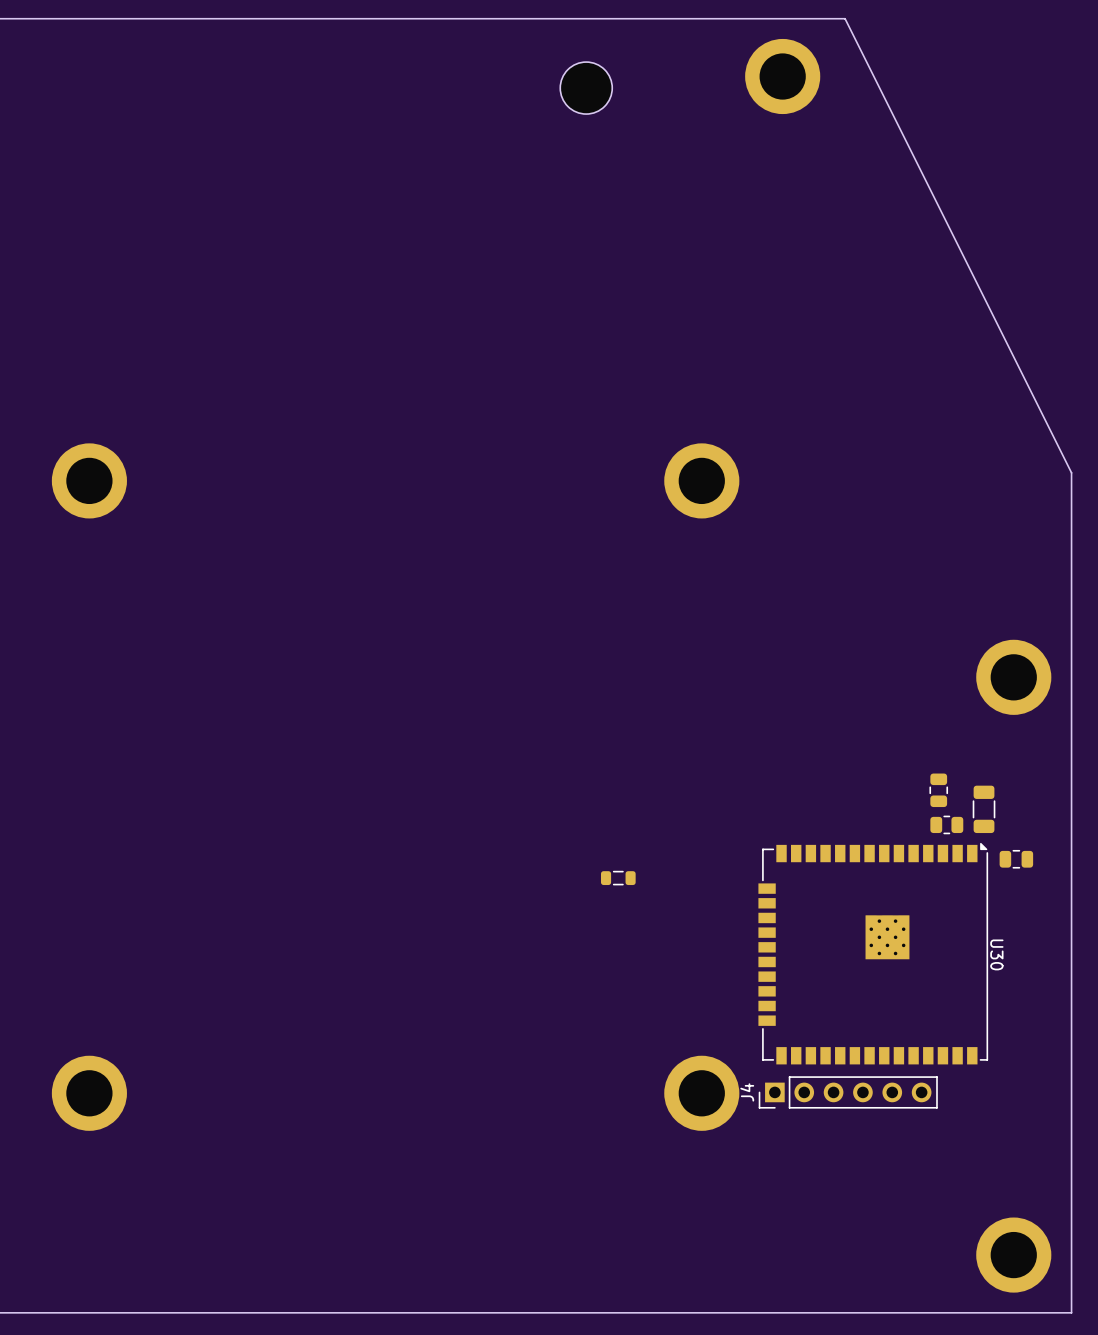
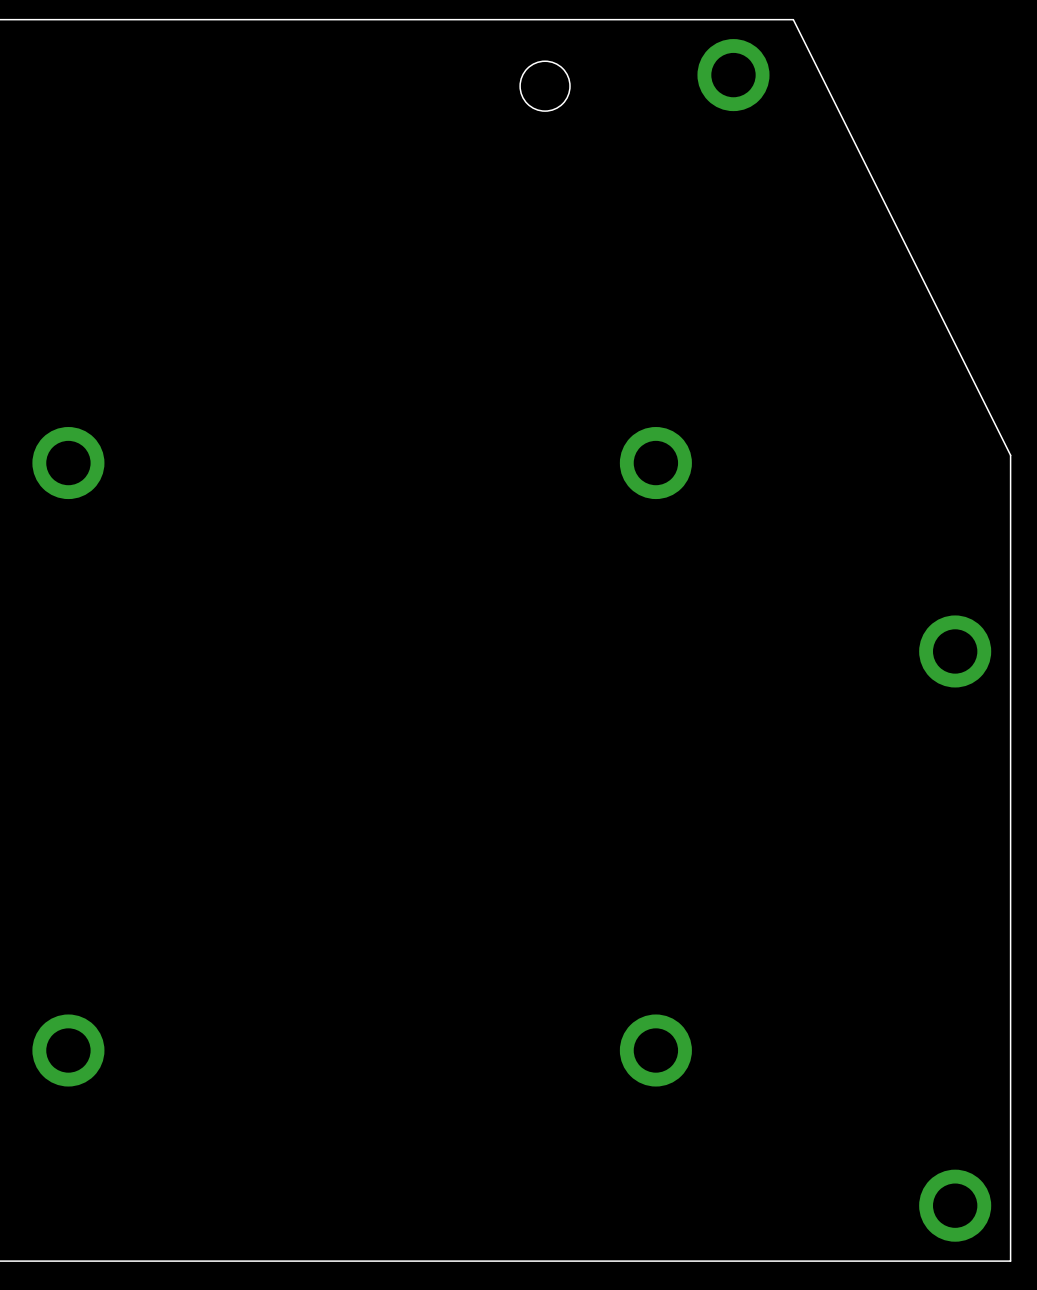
part: (938, 790) -> none
part: (984, 809) -> none
part: (946, 824) -> none
part: (1016, 859) -> none
part: (618, 878) -> none
U30: (873, 953) -> none
J4: (848, 1092) -> none

